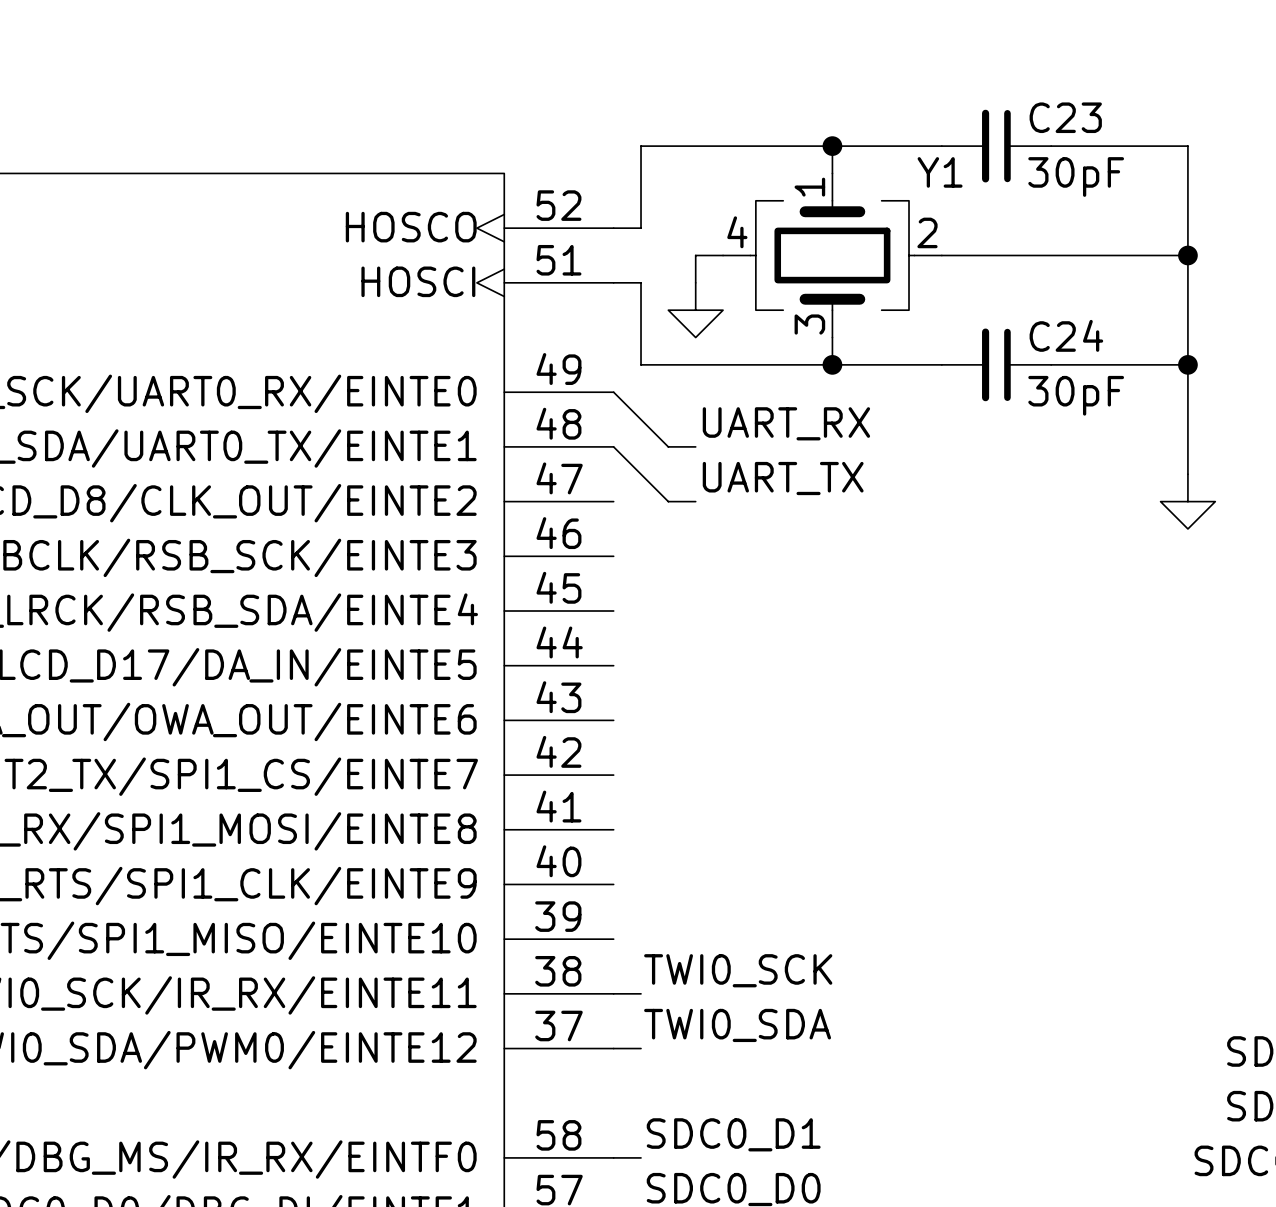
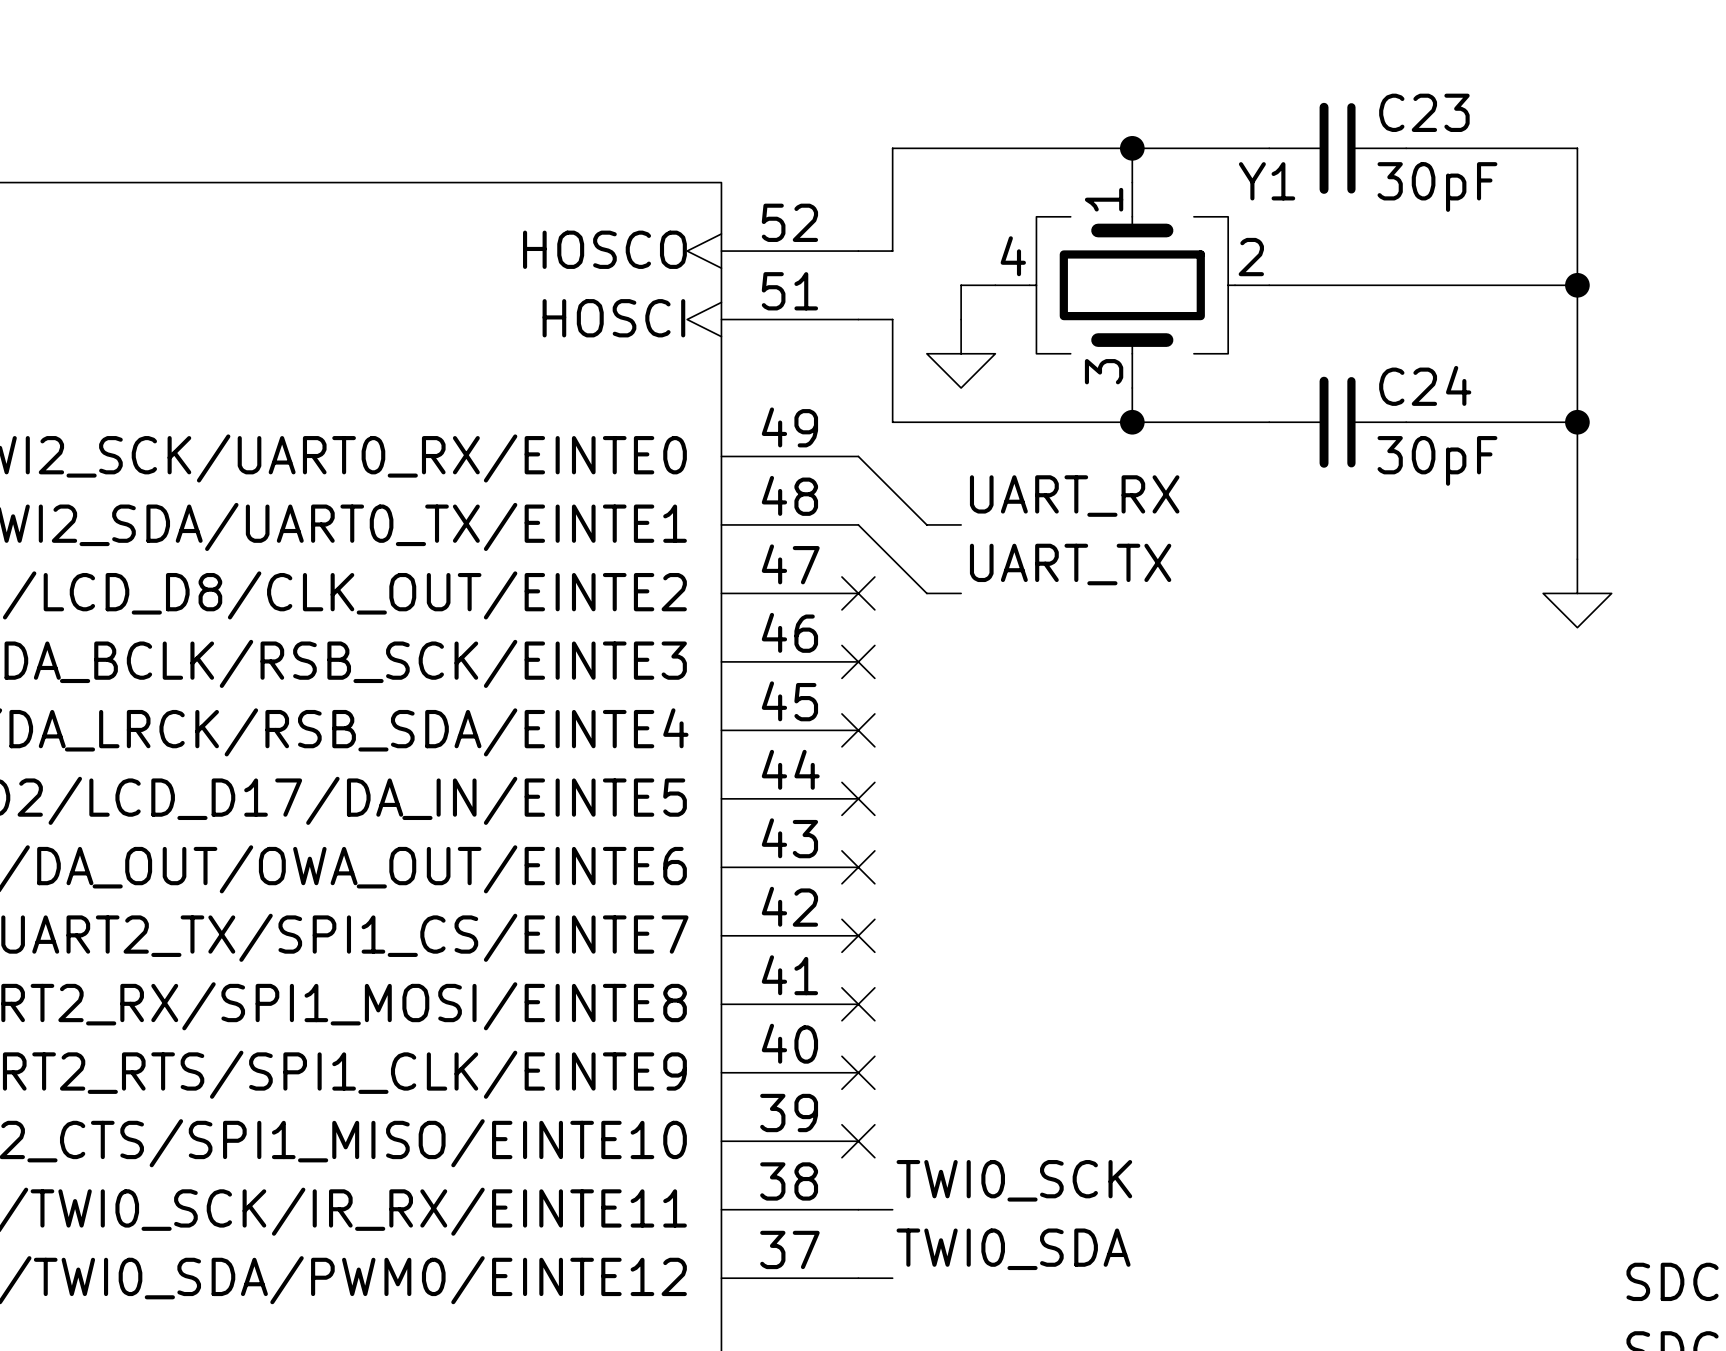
no-connect mark: none -> (858, 593)
no-connect mark: none -> (858, 661)
no-connect mark: none -> (858, 730)
no-connect mark: none -> (858, 798)
no-connect mark: none -> (858, 867)
no-connect mark: none -> (858, 935)
no-connect mark: none -> (858, 1004)
no-connect mark: none -> (858, 1072)
no-connect mark: none -> (858, 1141)

